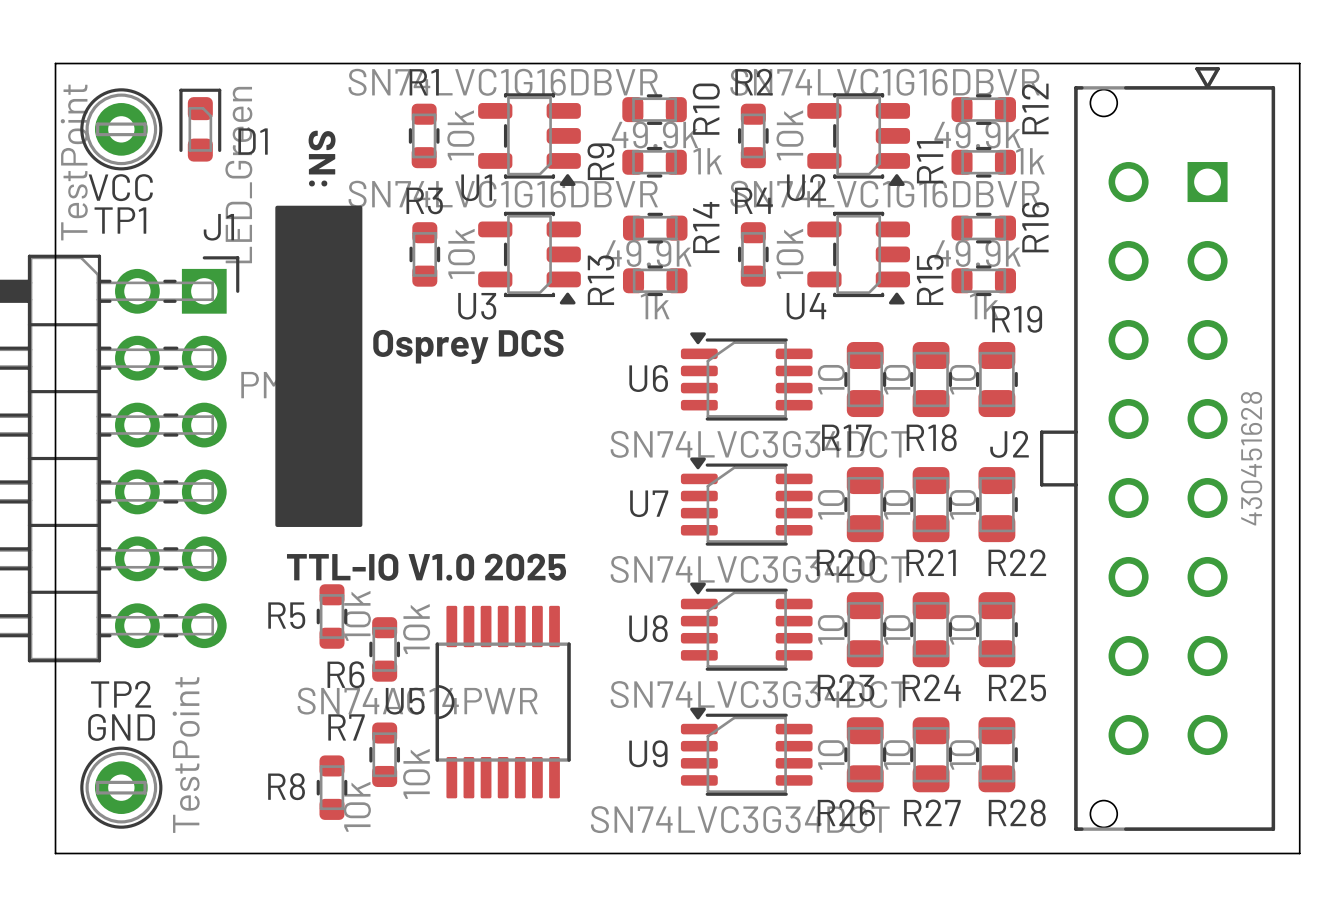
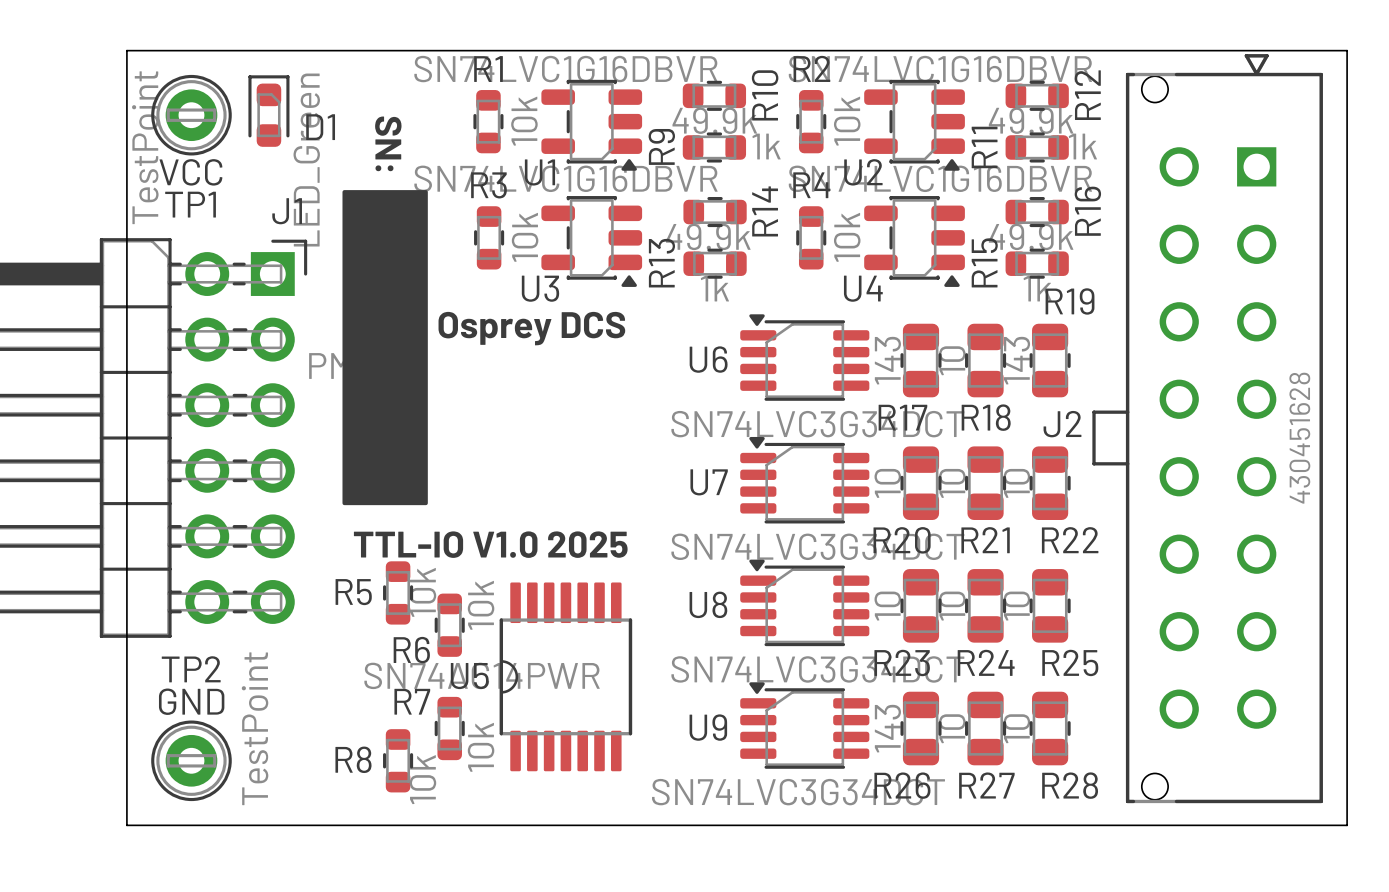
R17 value: 10 (831, 379) -> 143 (887, 360)
R19 value: 10 (963, 379) -> 143 (1017, 360)
R26 value: 10 (831, 754) -> 143 (887, 728)

